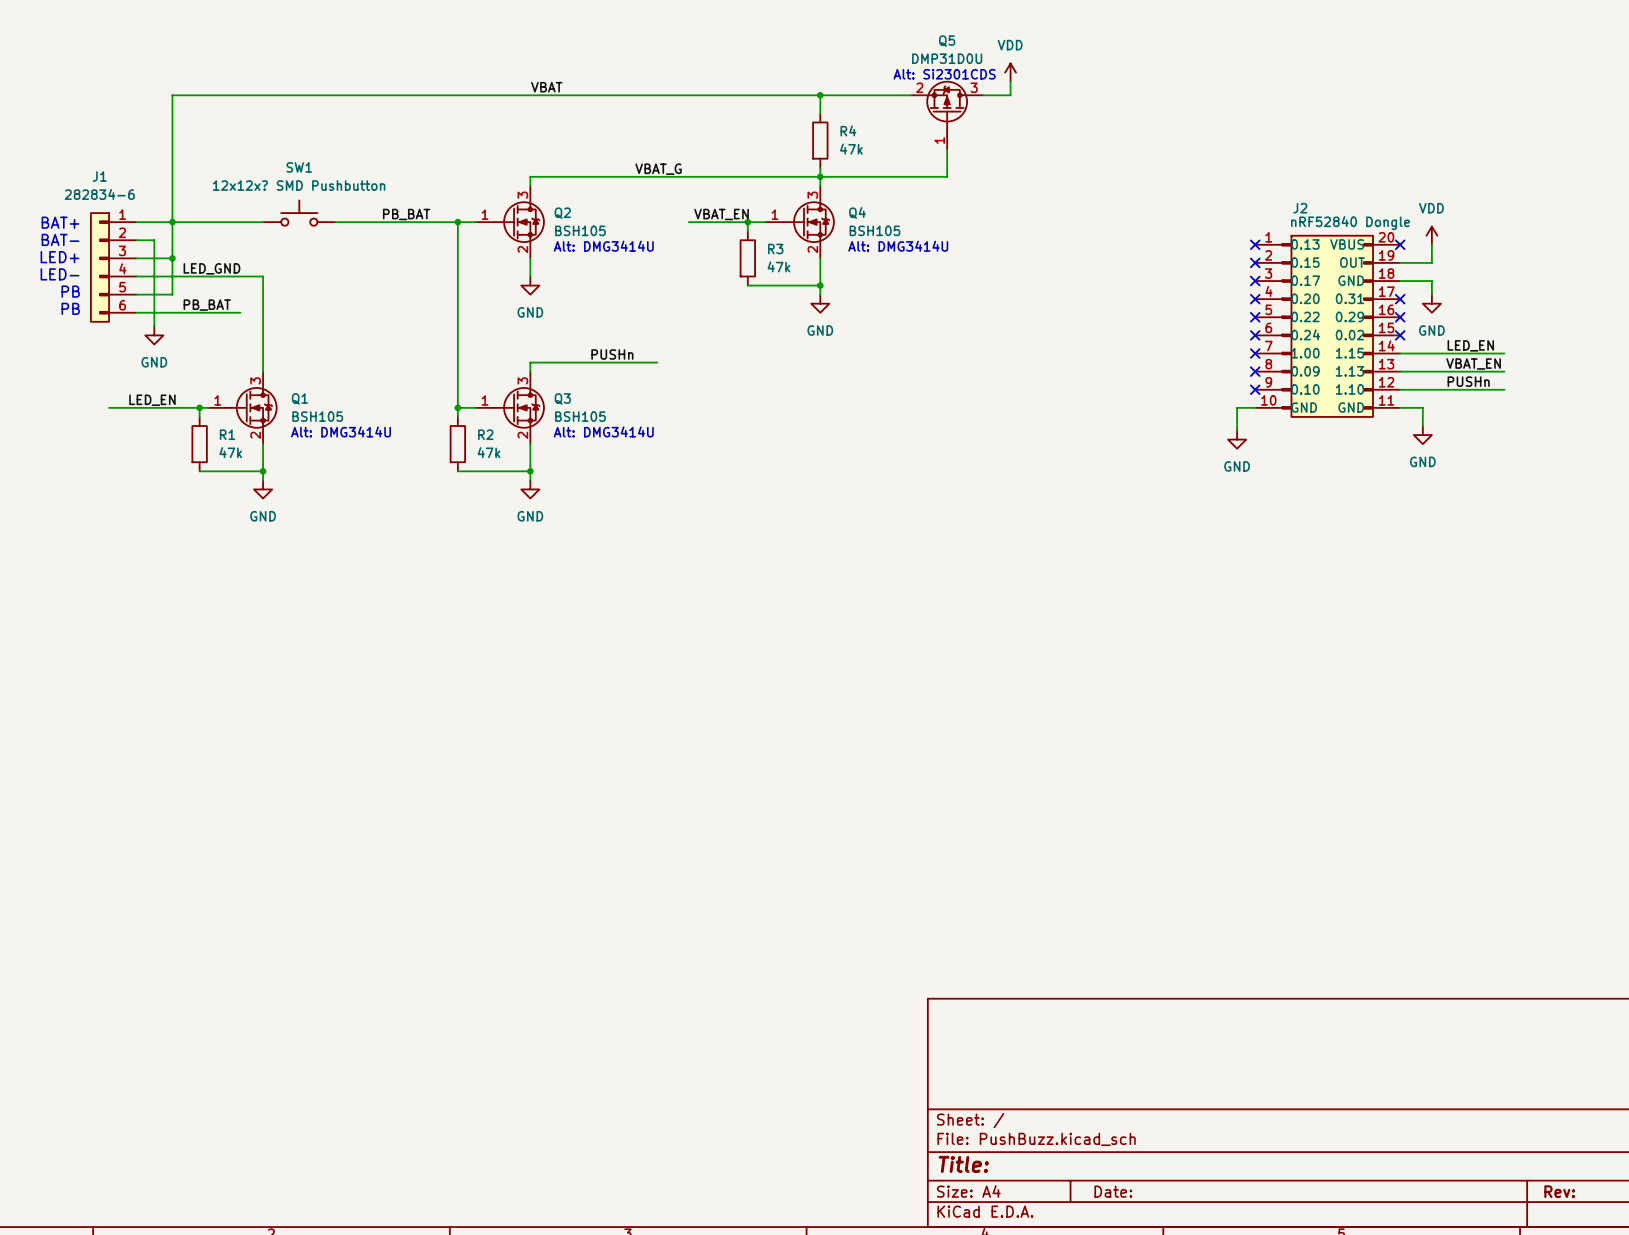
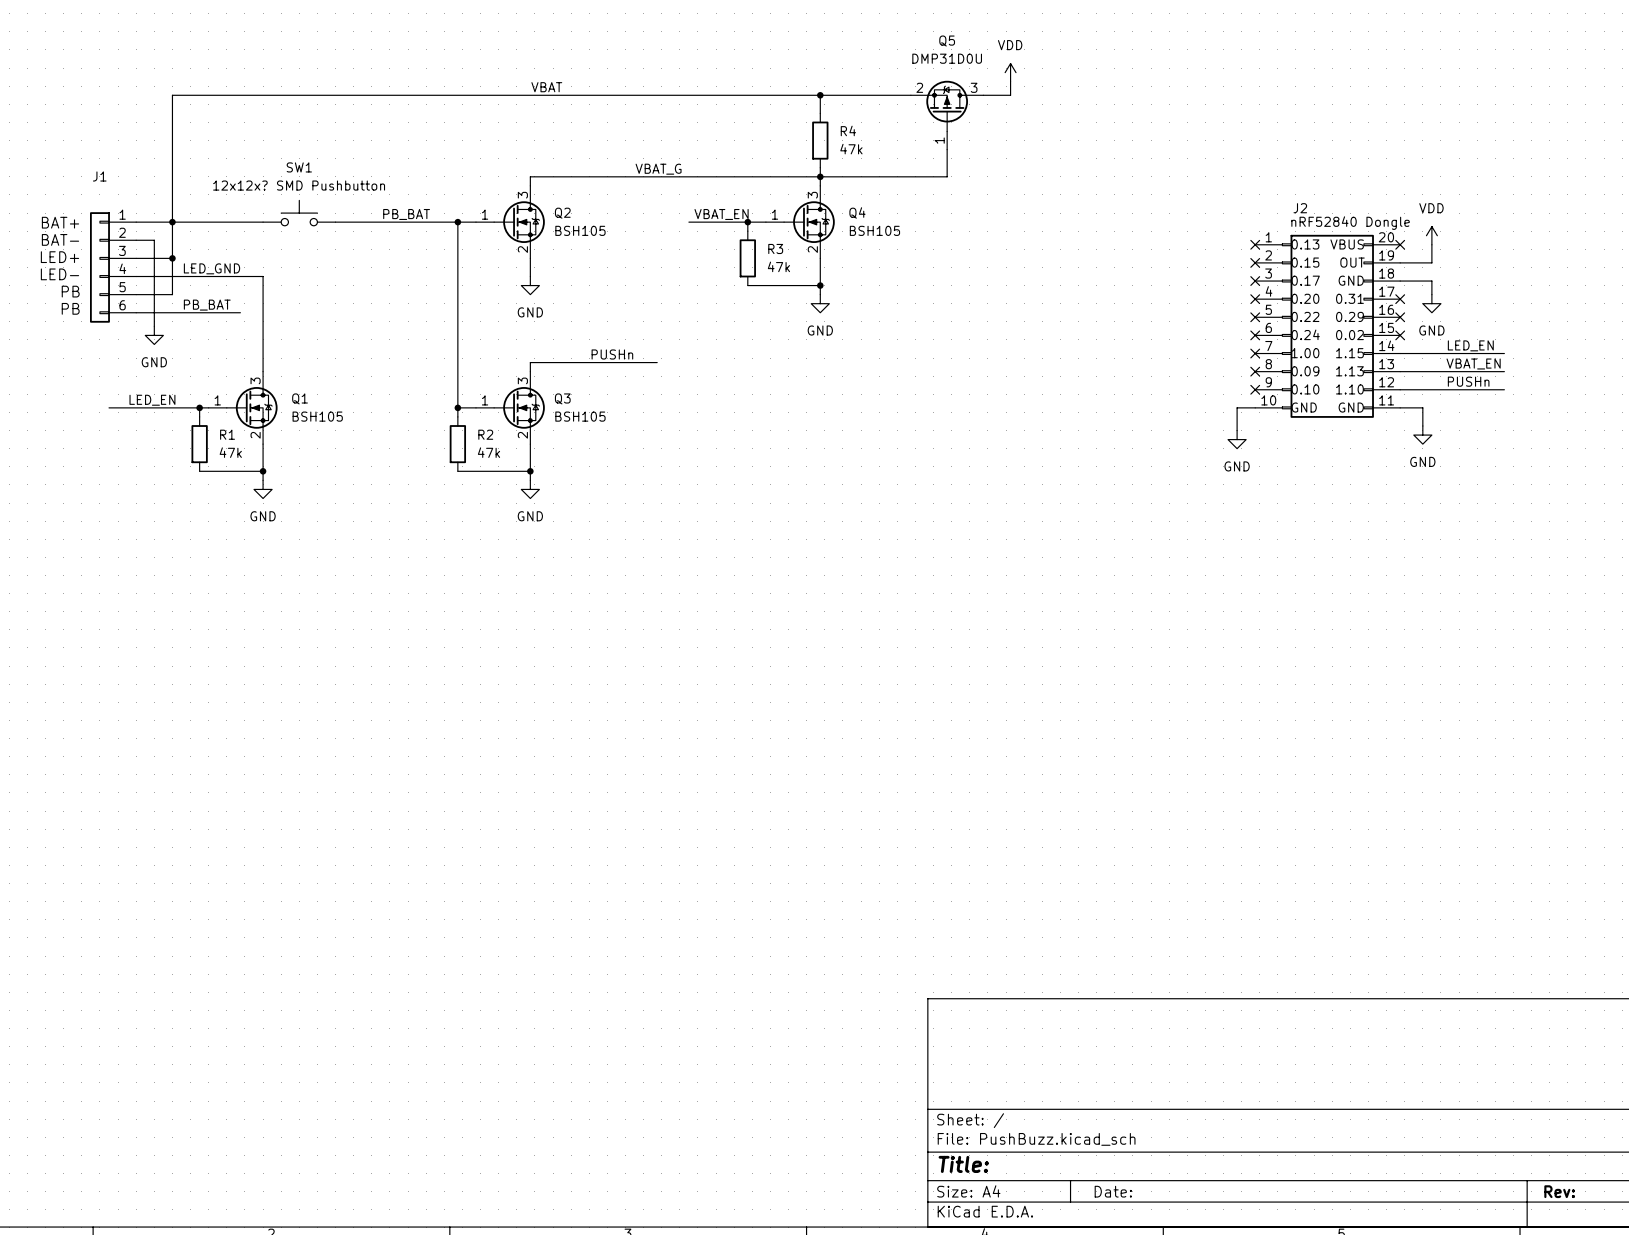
text: Alt: Si2301CDS (944, 74) -> none
J1 value: 282834-6 (99, 194) -> none
text: Alt: DMG3414U (603, 246) -> none
text: Alt: DMG3414U (898, 246) -> none
text: Alt: DMG3414U (341, 431) -> none
text: Alt: DMG3414U (603, 431) -> none

